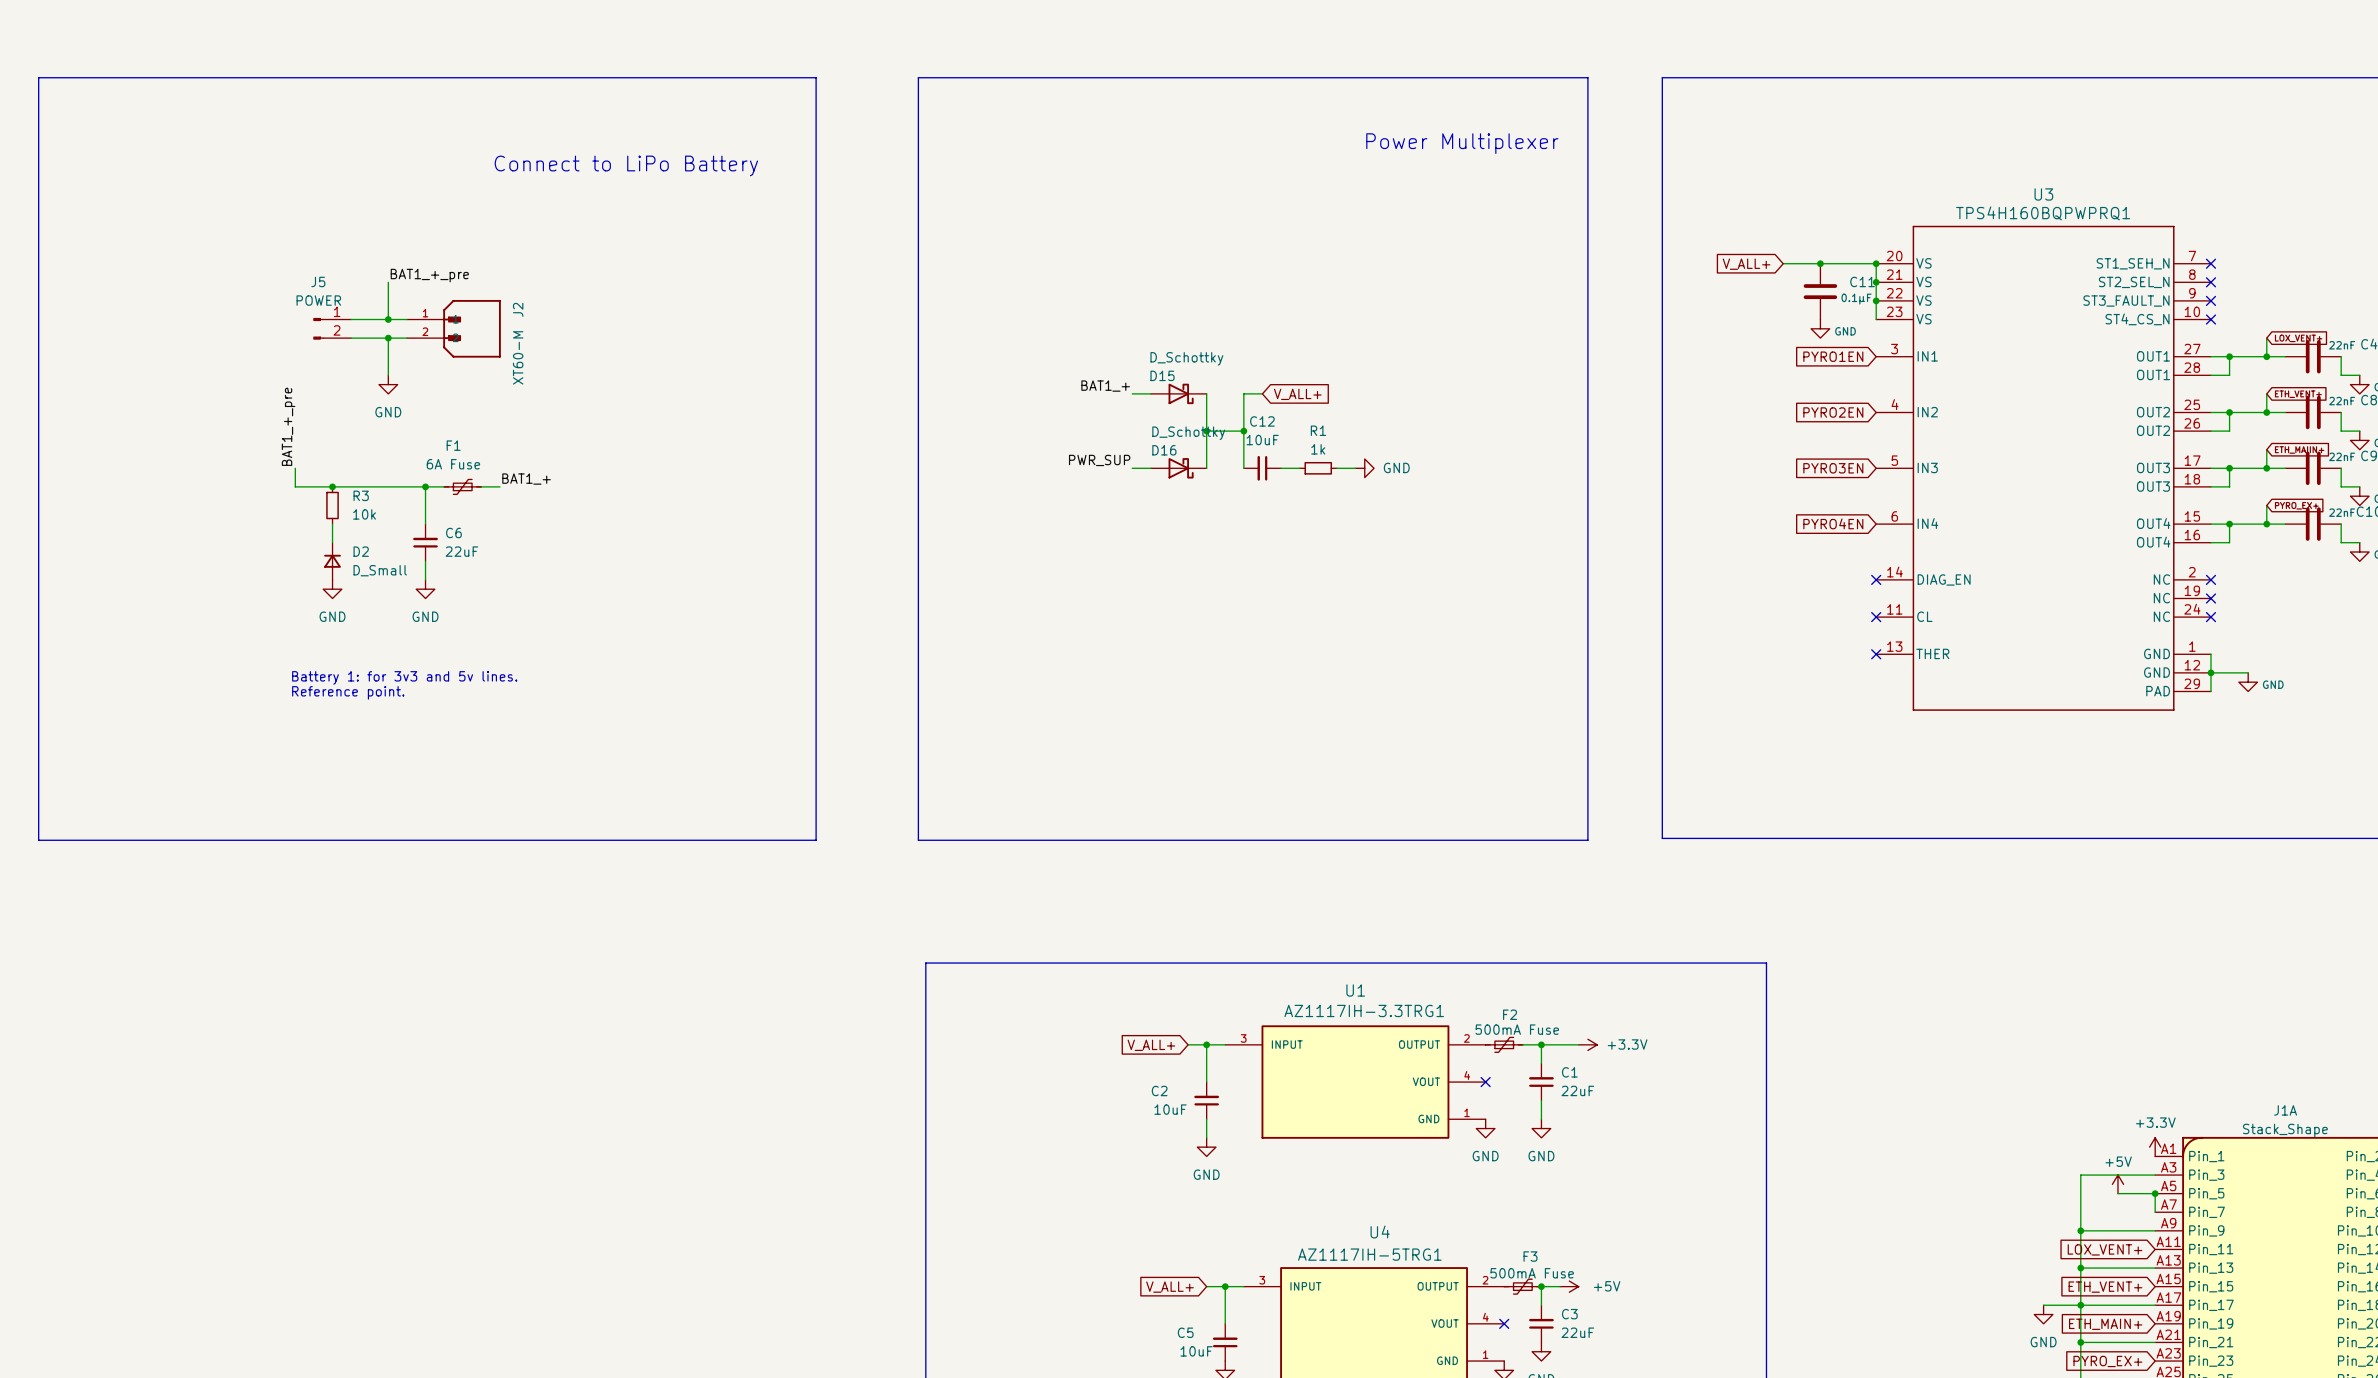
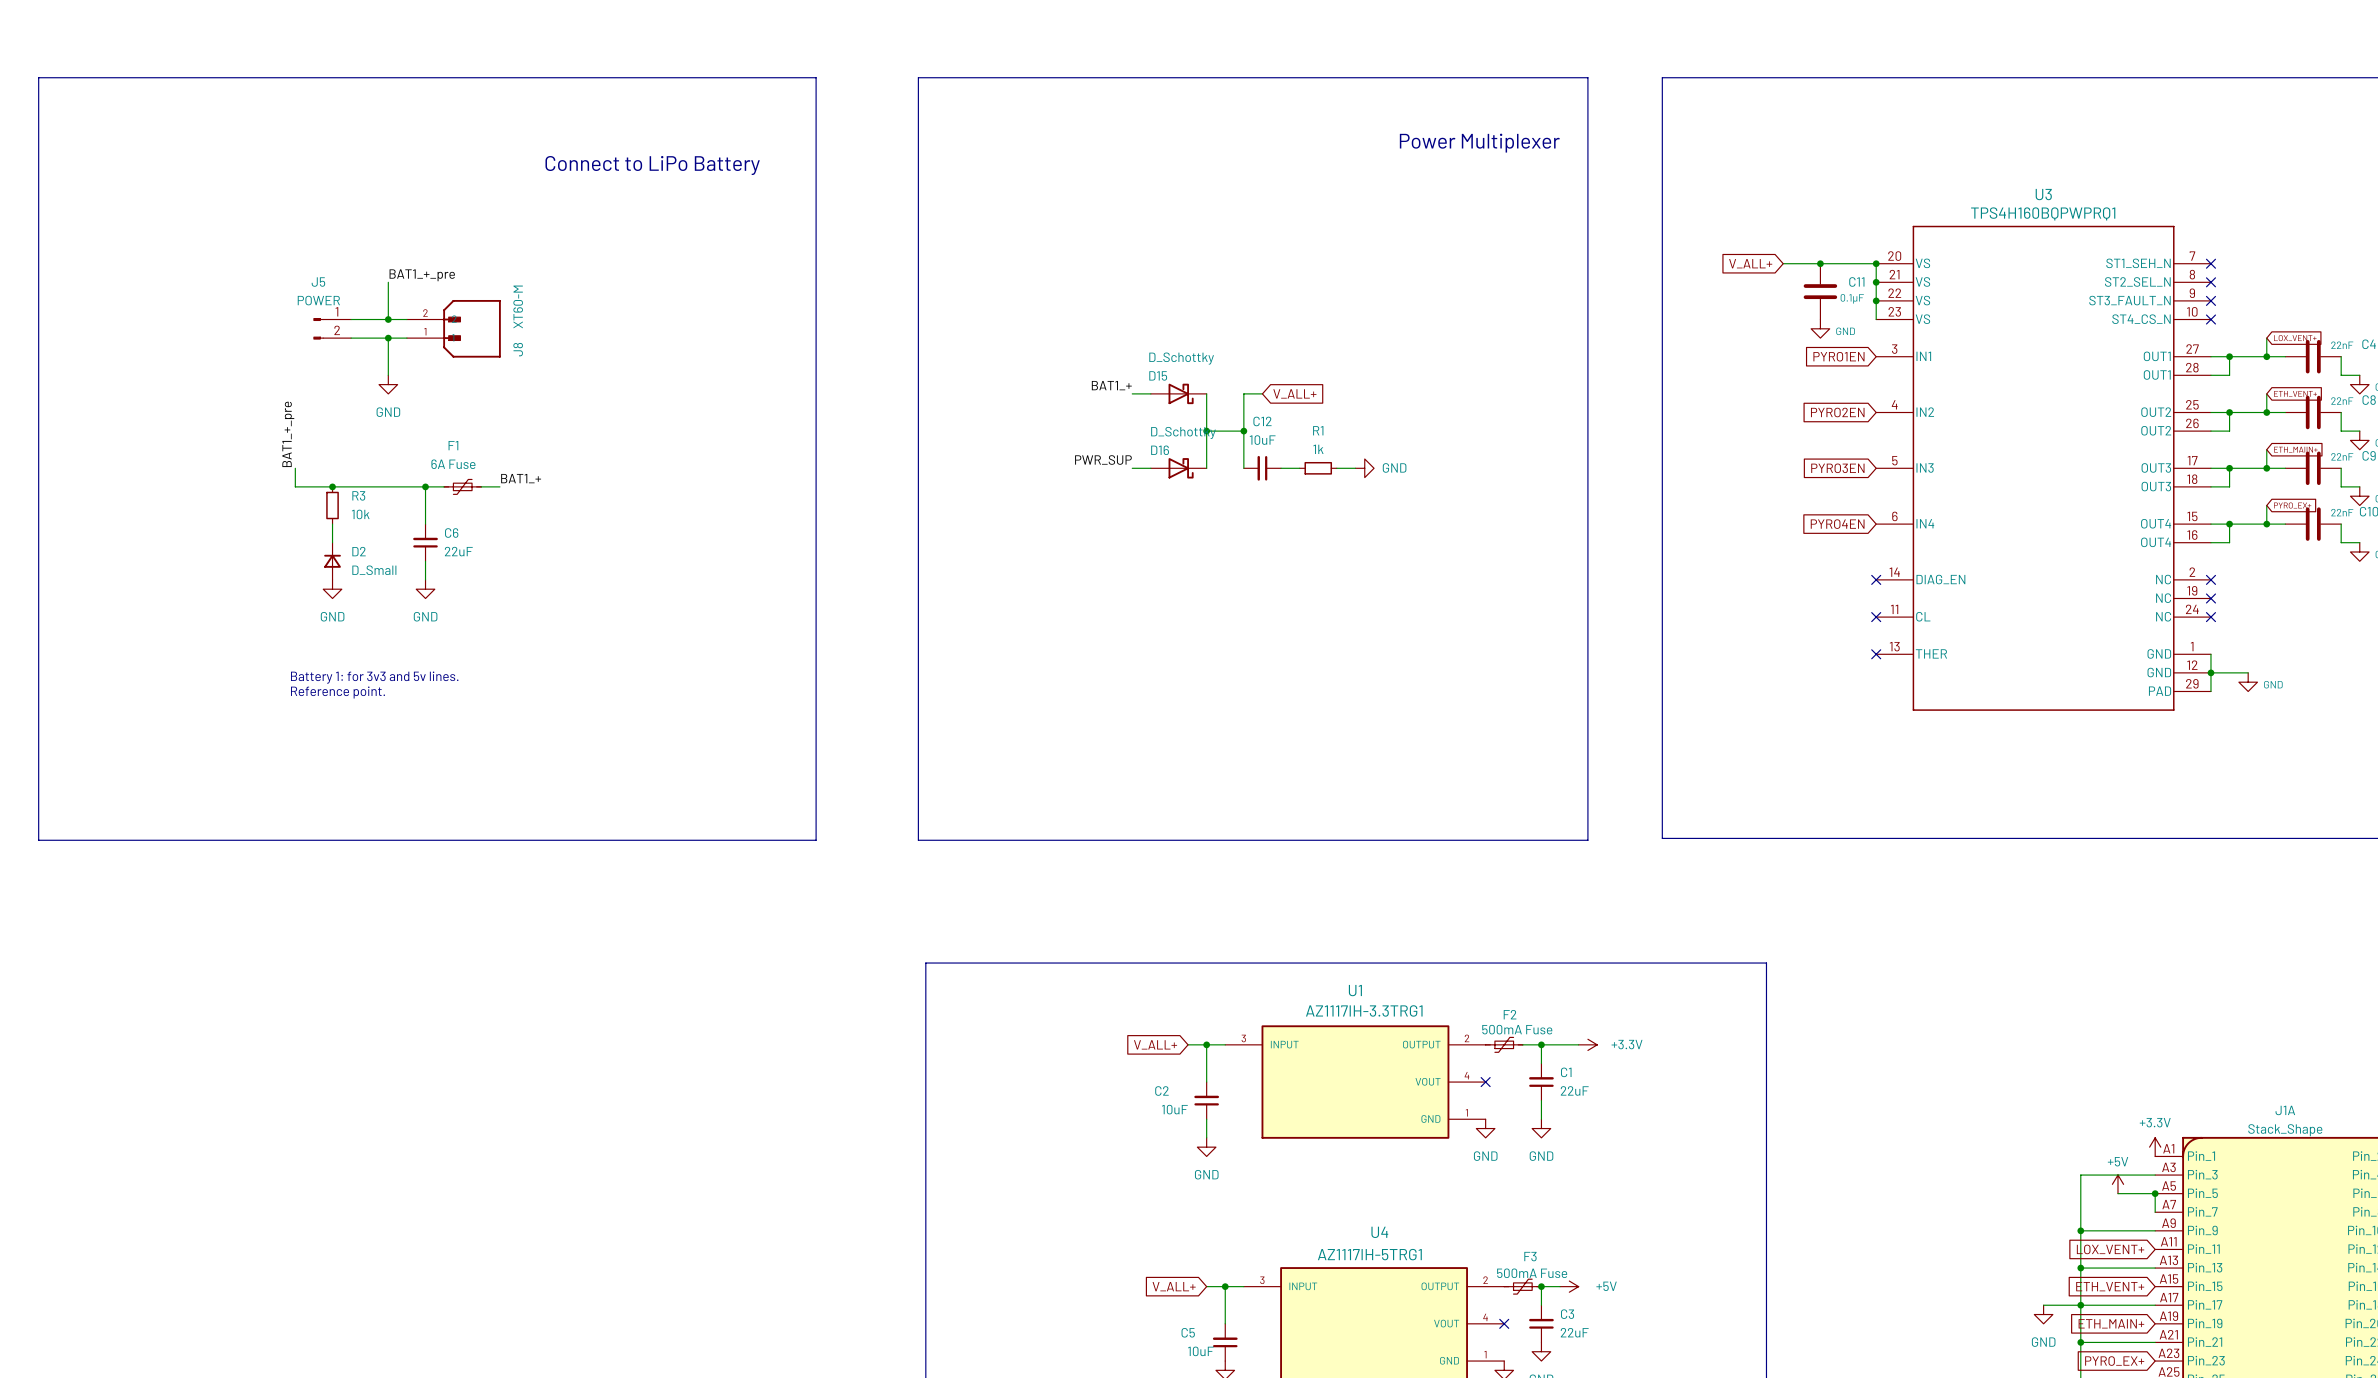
J2: XT60-M (453, 328) -> none
J8: none -> XT60-M (453, 328)

